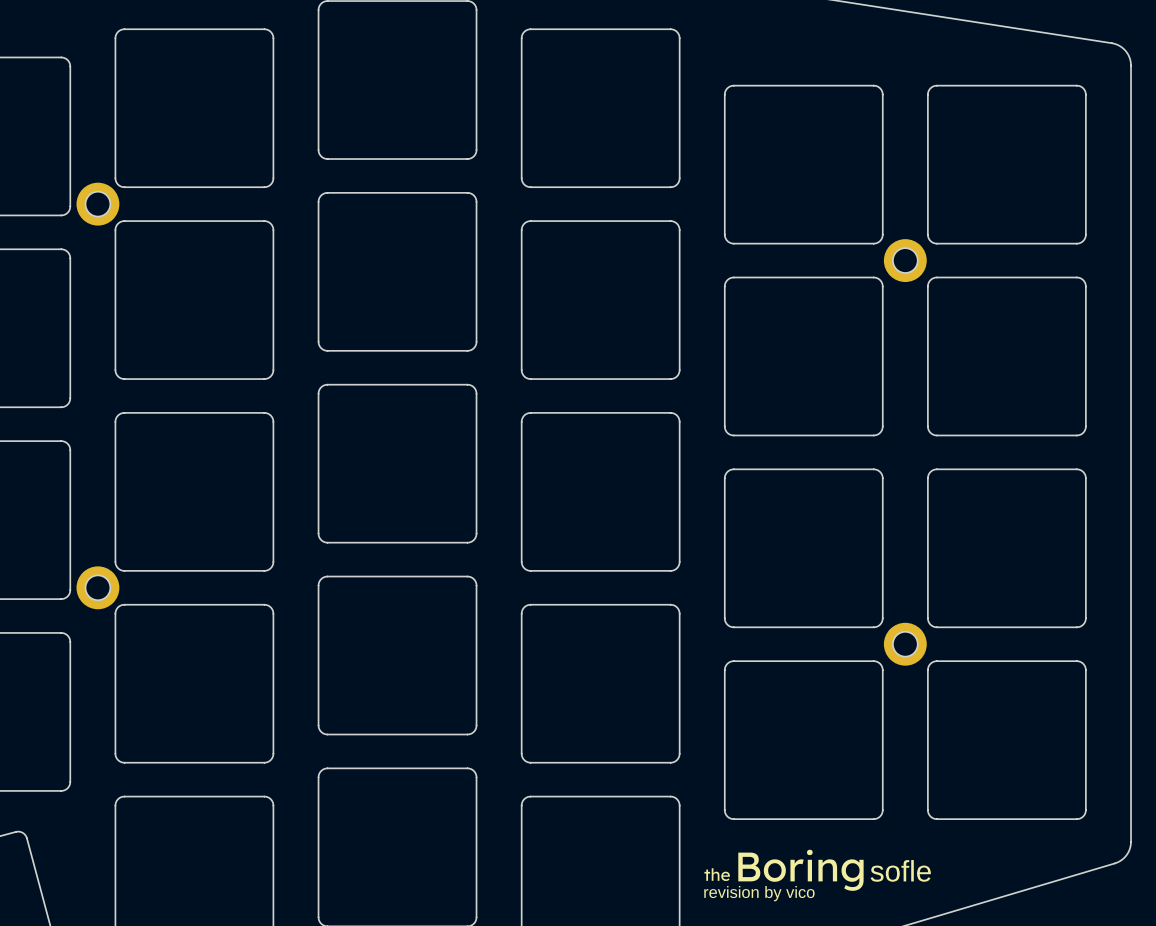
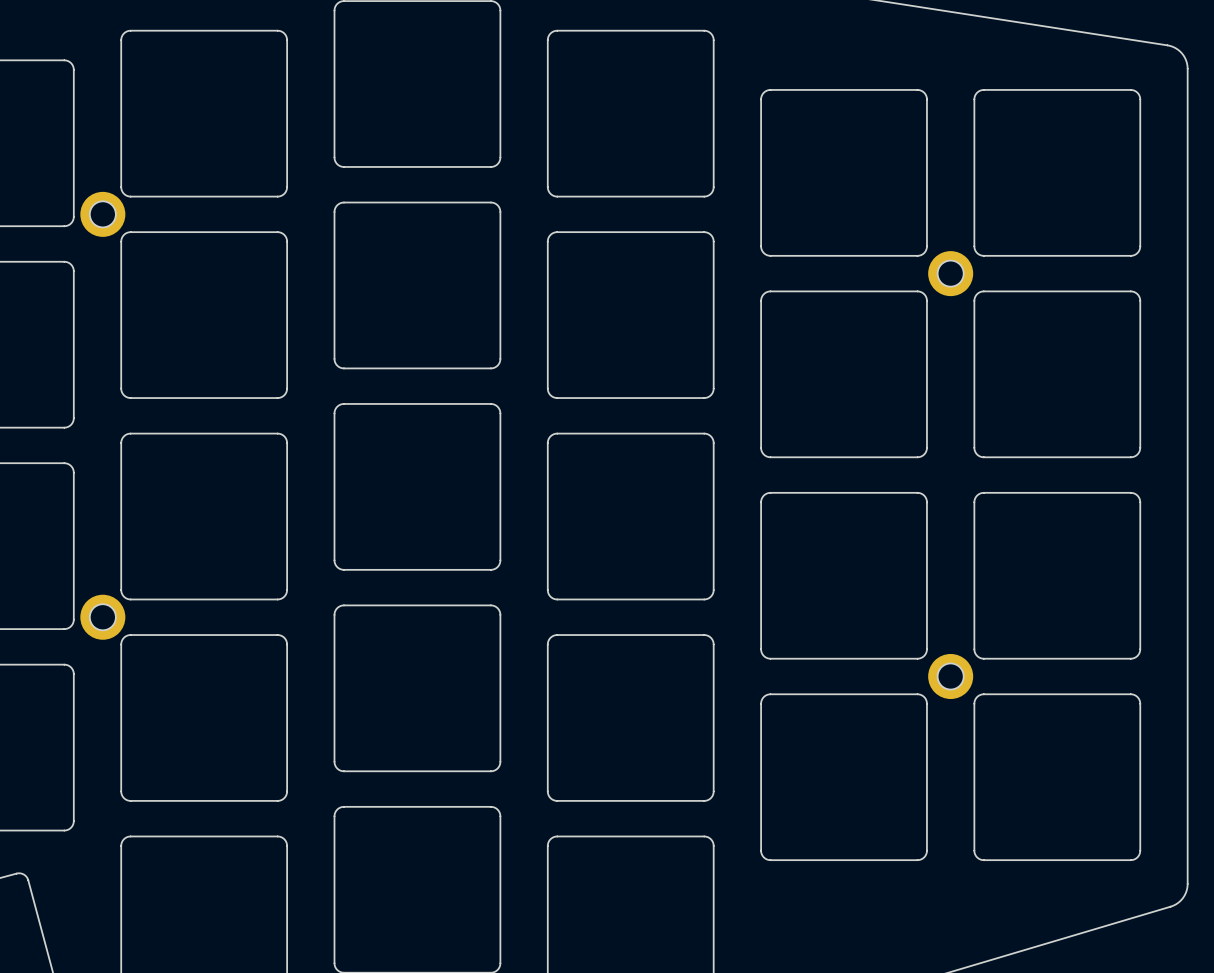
drawing: [704, 849, 864, 891] -> none

